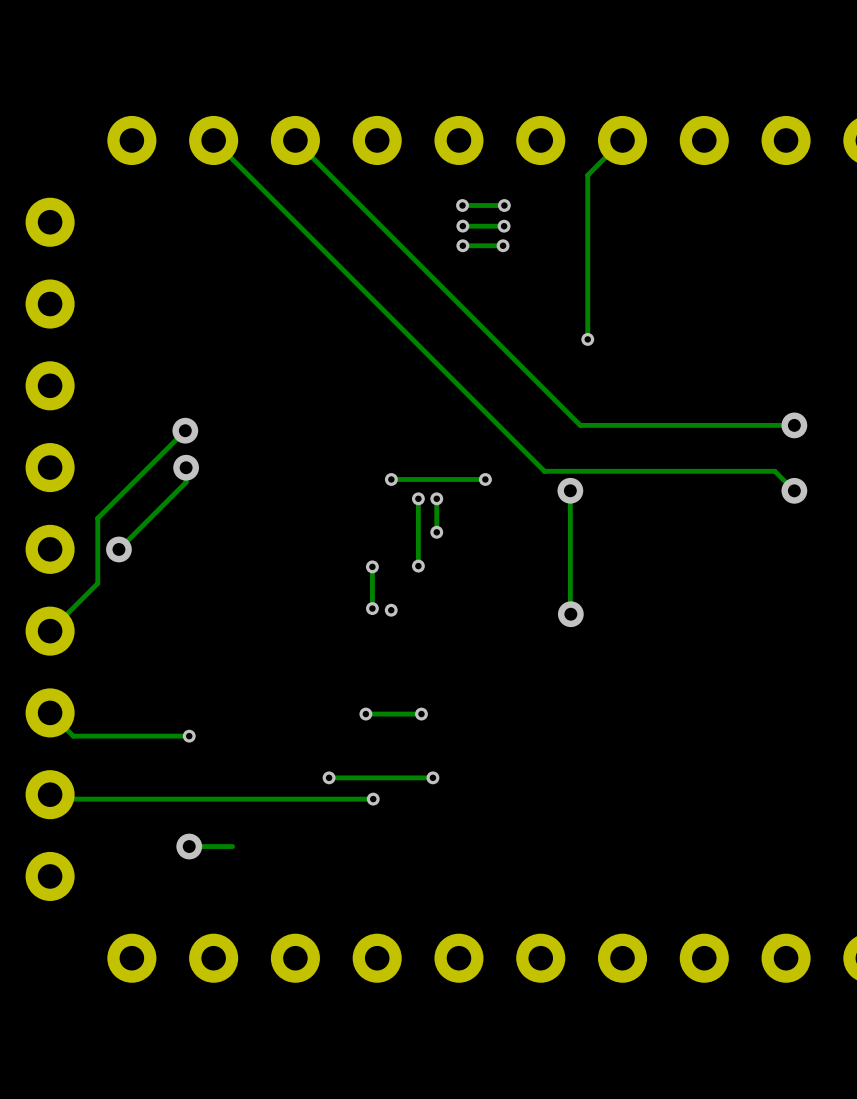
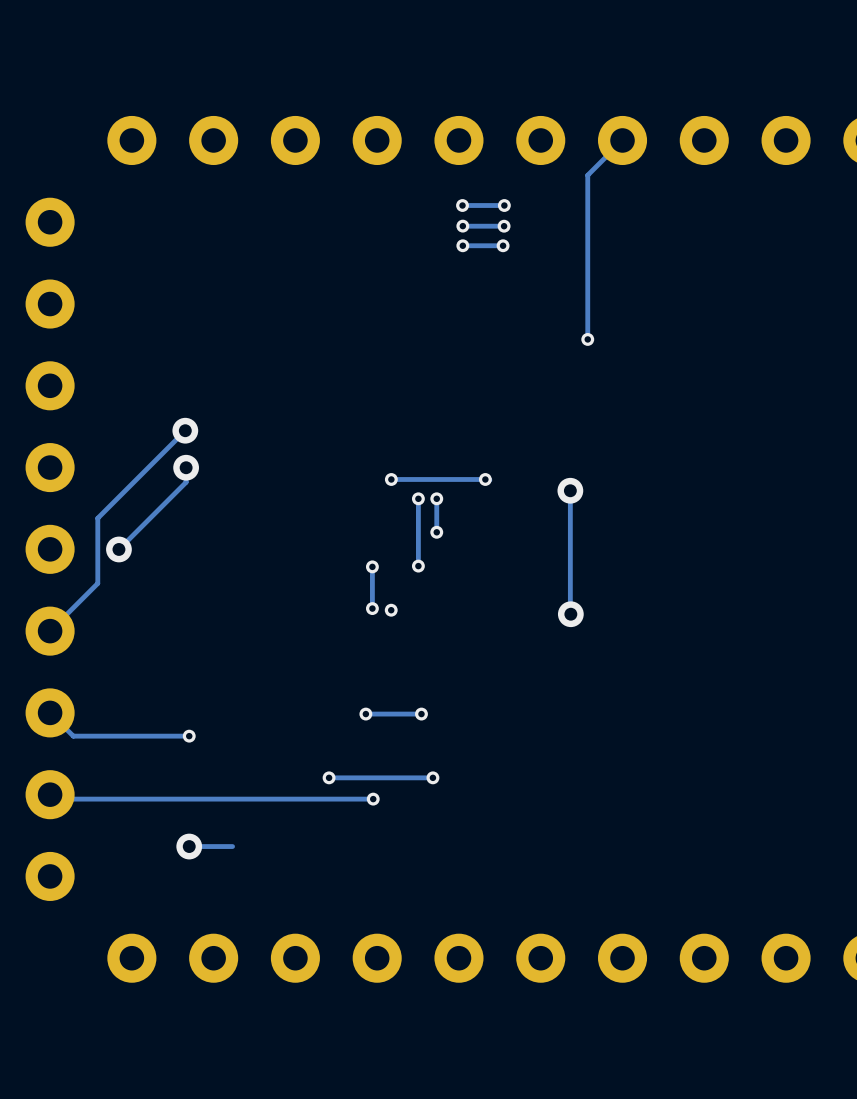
track: (213, 140) (544, 471) (774, 471) (794, 490) -> none
track: (295, 140) (580, 425) (794, 425) -> none
via: (794, 425) -> none
via: (794, 490) -> none

